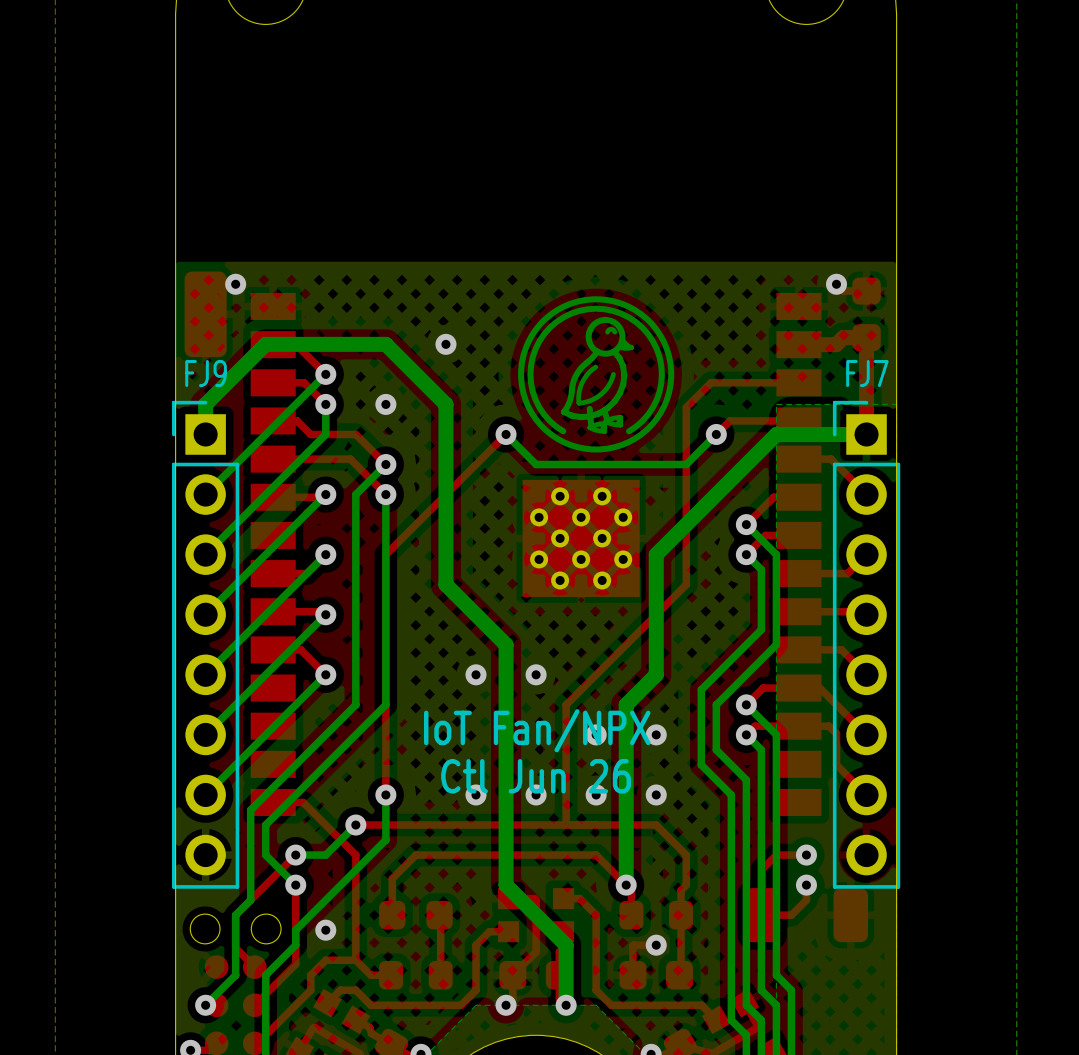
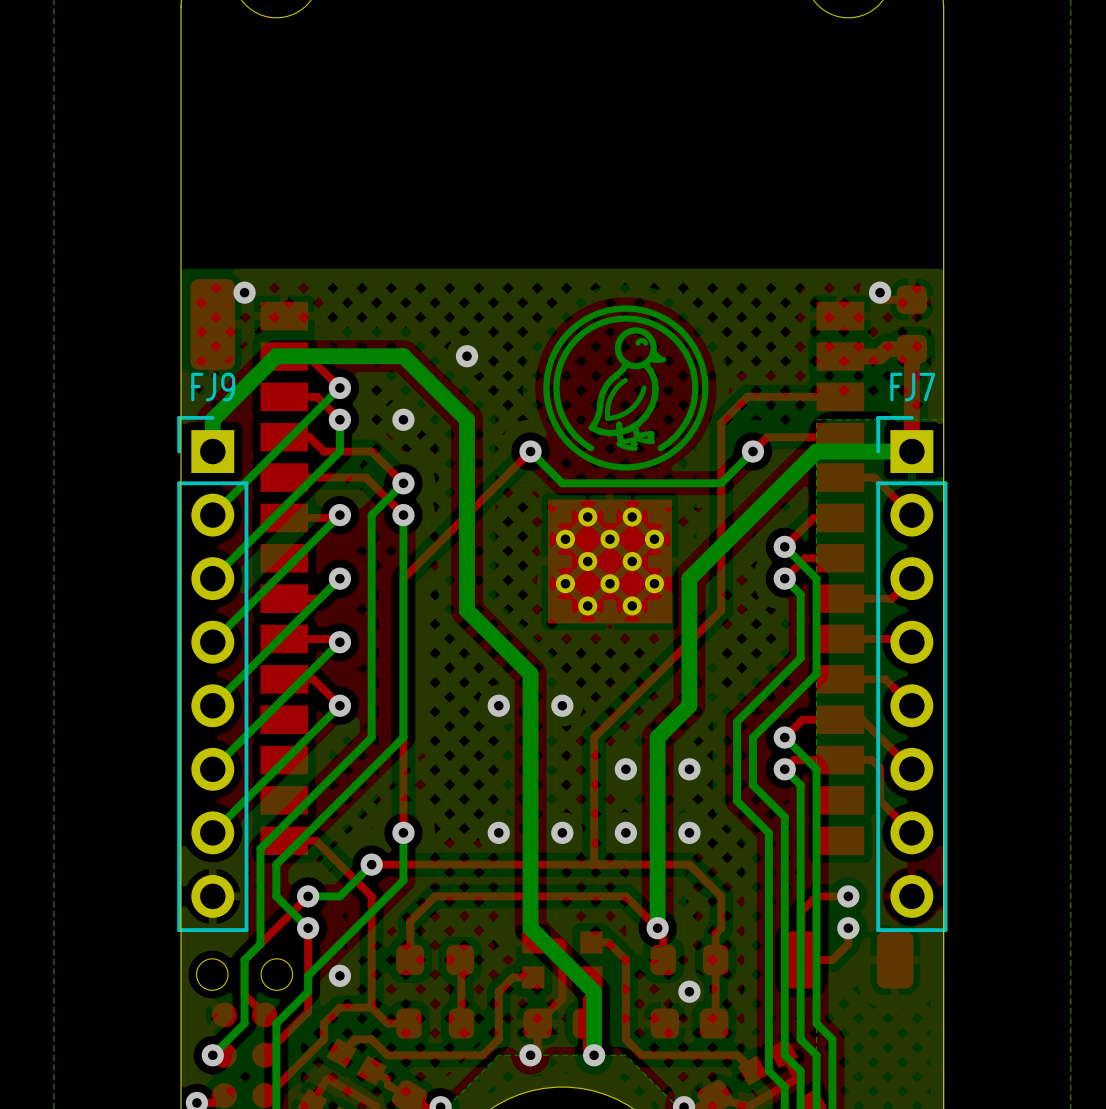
text: IoT Fan/NPX (537, 730) -> none
text: Ctl Jun 26 (536, 776) -> none
top track: (656, 945) (632, 945) (632, 975) -> none

